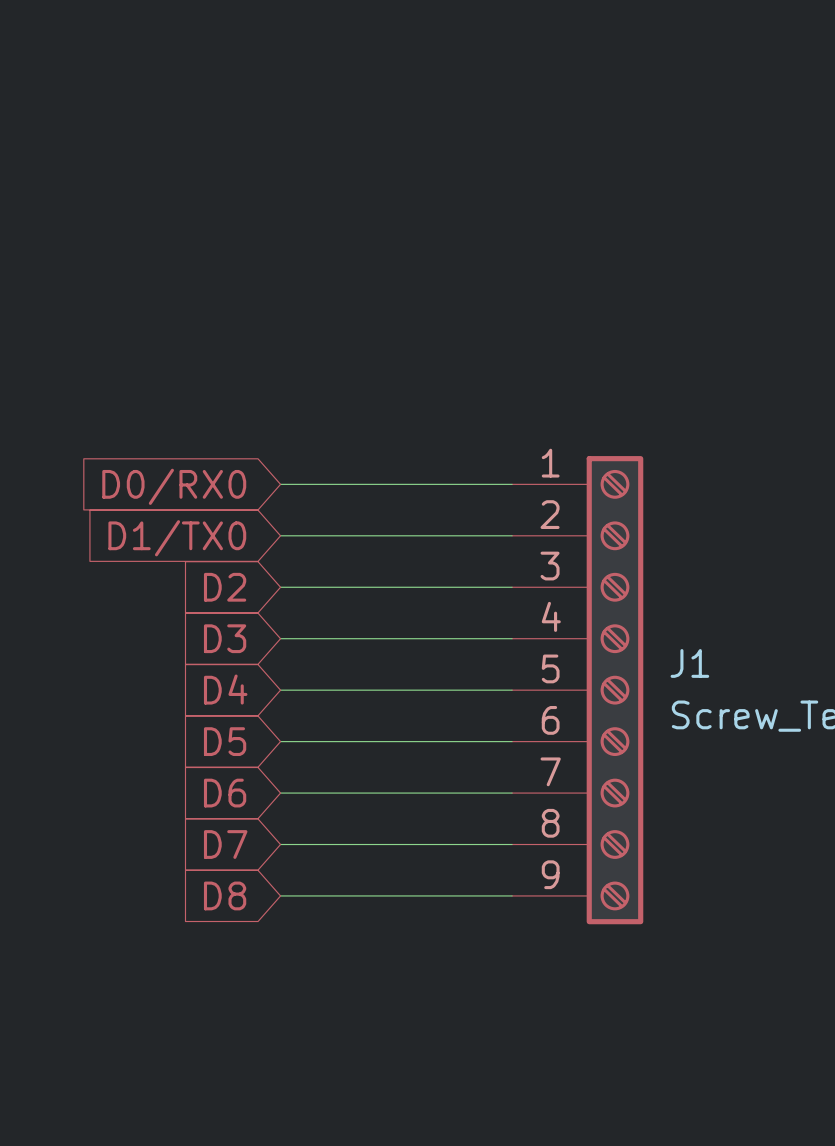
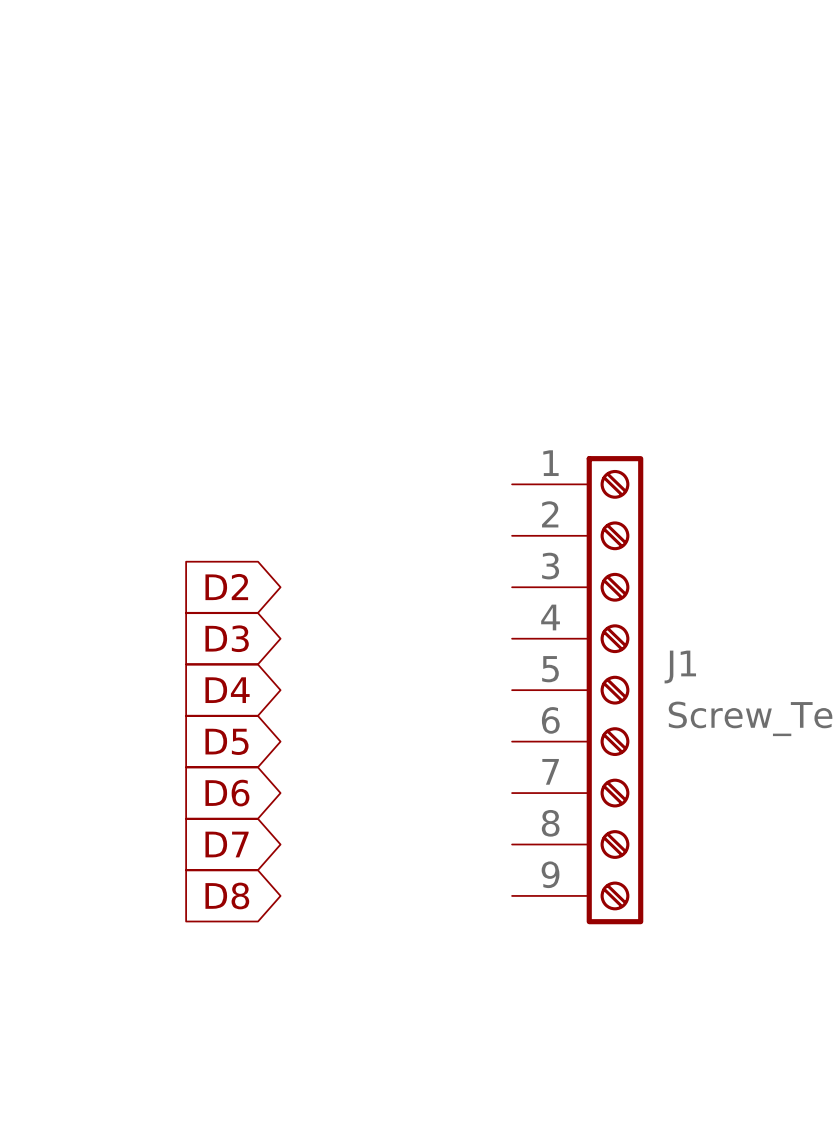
wire: (280, 484) (512, 484) -> none
global label: D0/RX0 (174, 486) -> none
wire: (280, 535) (512, 535) -> none
global label: D1/TX0 (177, 538) -> none
wire: (280, 587) (512, 587) -> none
wire: (280, 638) (512, 638) -> none
wire: (280, 690) (512, 690) -> none
wire: (280, 741) (512, 741) -> none
wire: (280, 793) (512, 793) -> none
wire: (280, 844) (512, 844) -> none
wire: (280, 895) (512, 895) -> none

